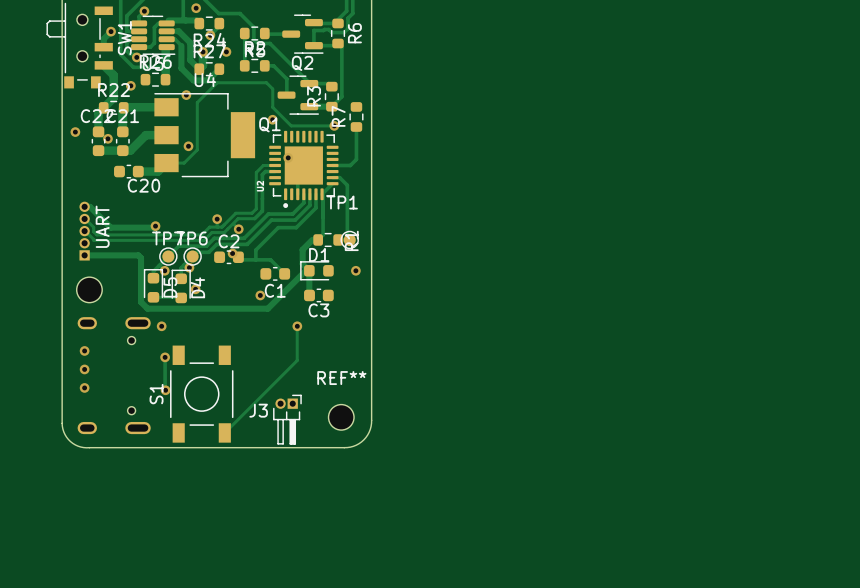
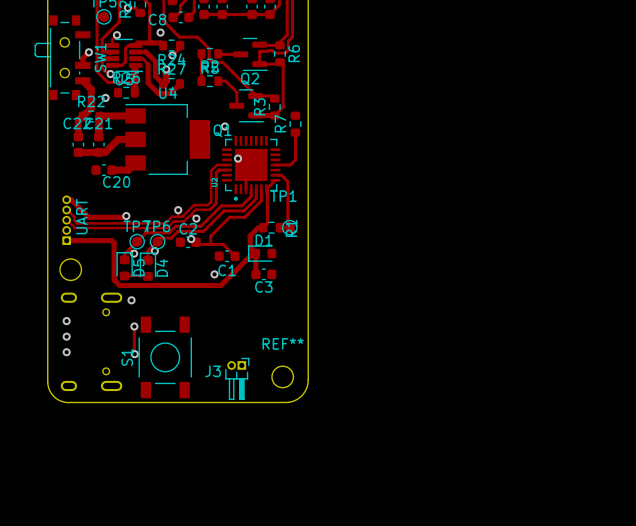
via: (226, 51) -> none
via: (186, 95) -> none
track: (334, 125) (291, 125) (272, 107) (272, 89) (266, 82) (217, 82) (197, 102) (197, 149) (184, 163) (166, 163) -> none
via: (334, 125) -> none
via: (75, 132) -> none
via: (107, 138) -> none
via: (188, 146) -> none
via: (355, 270) -> none
via: (195, 289) -> none
track: (297, 326) (297, 360) (224, 432) -> none
via: (297, 326) -> none

